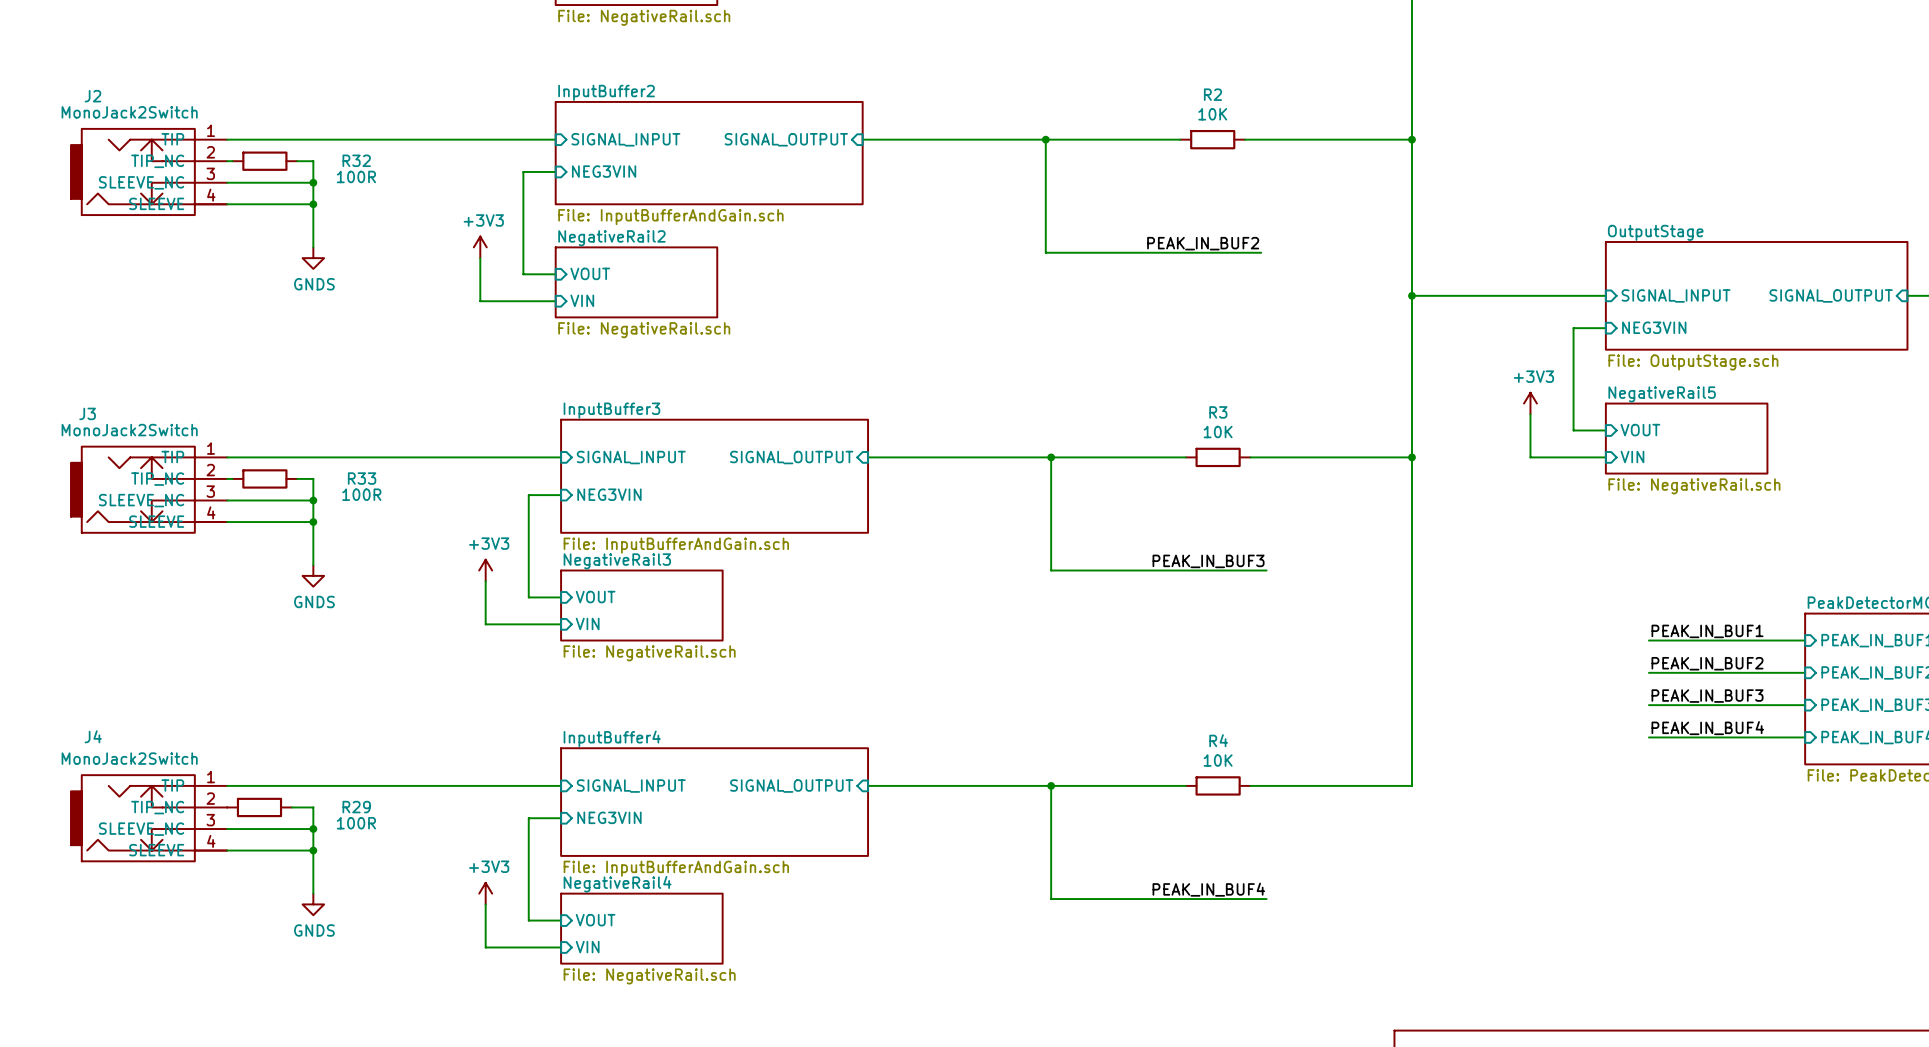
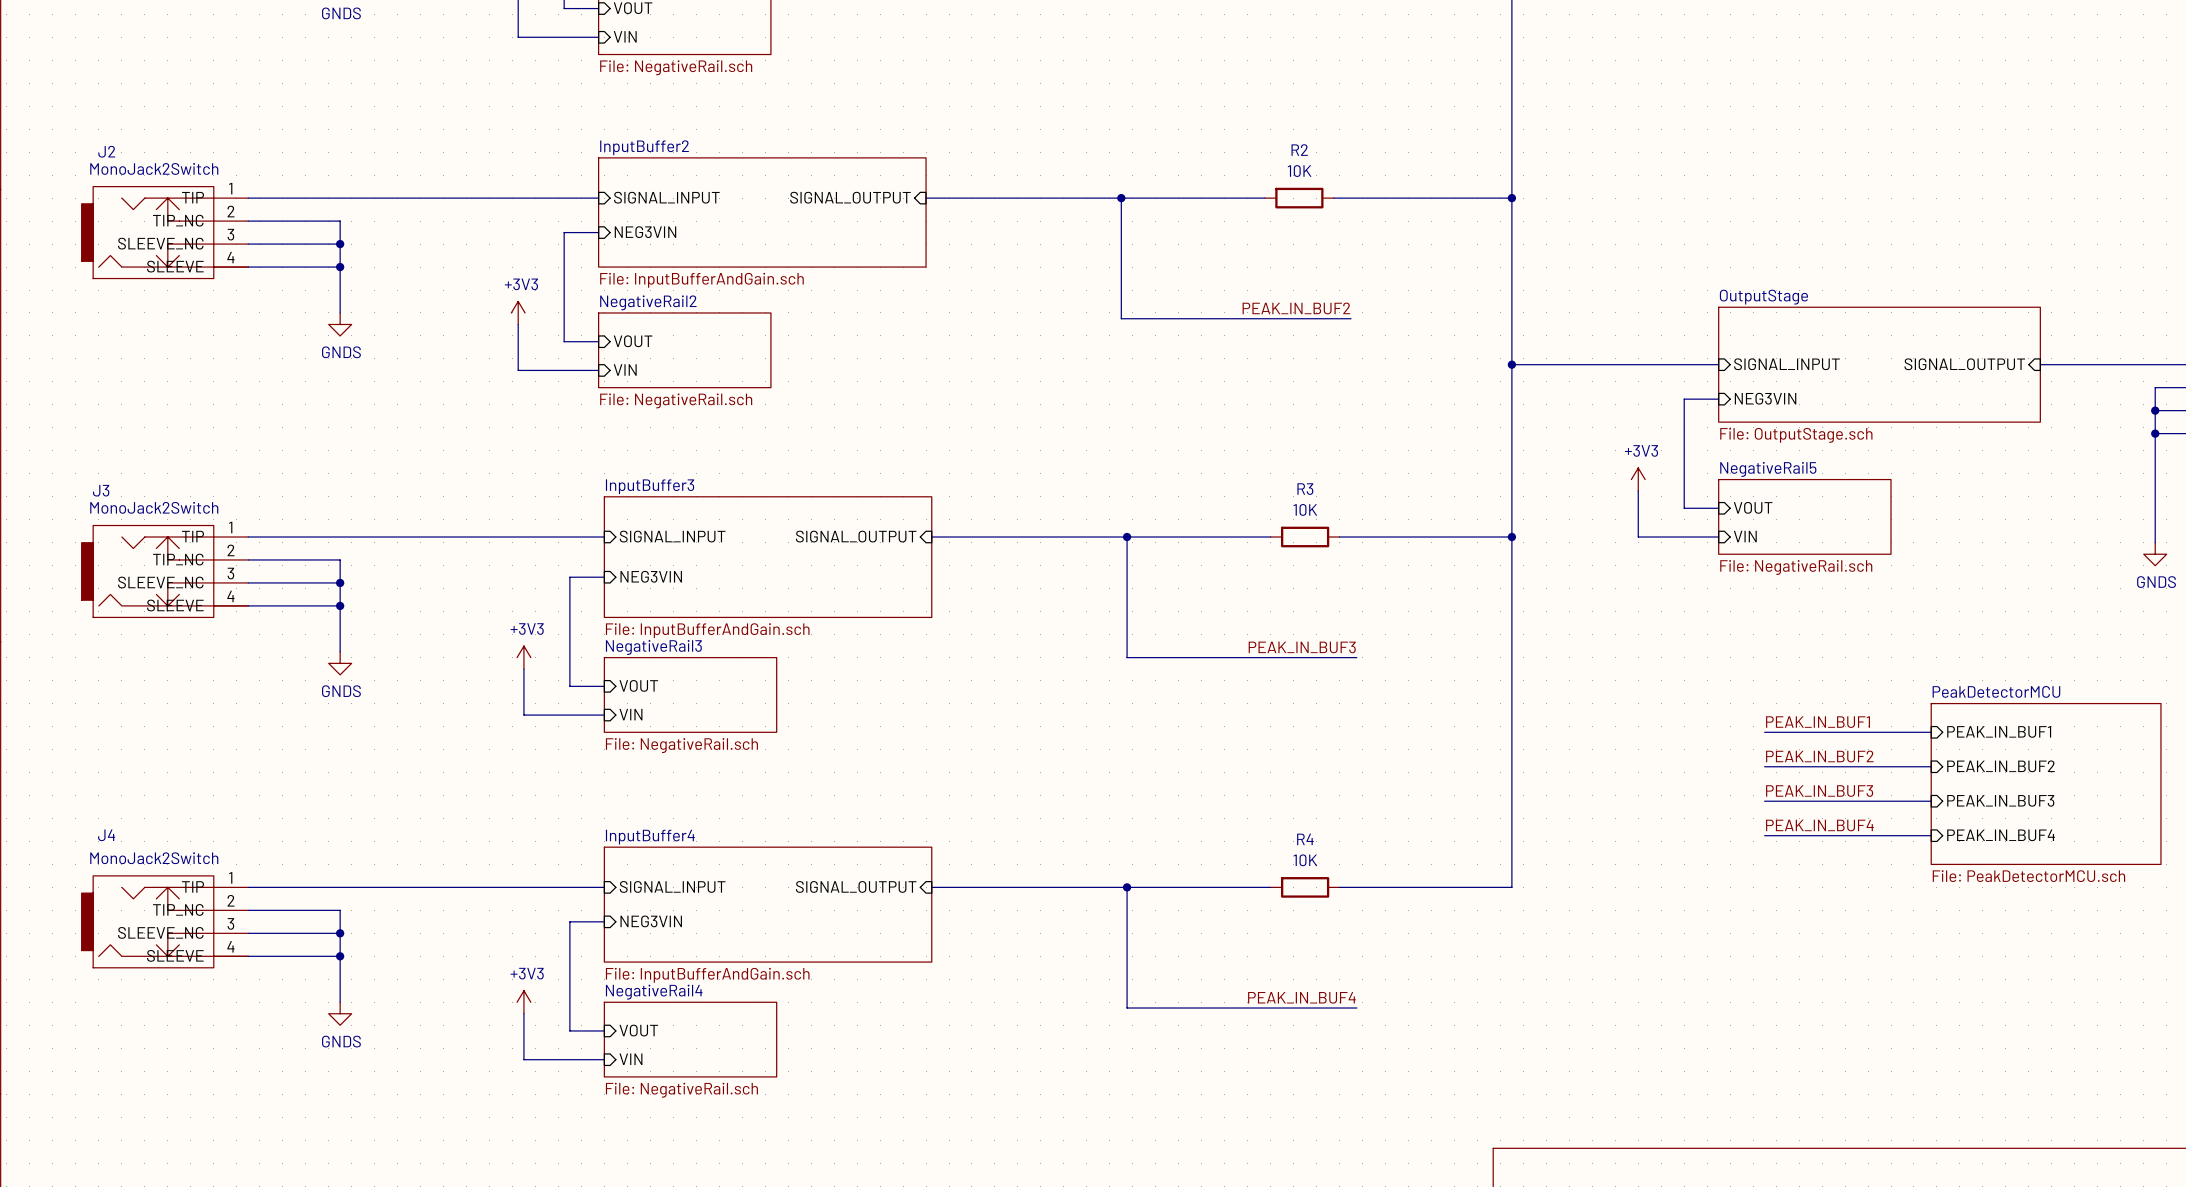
wire: none -> (253, 221) (322, 221)
R32: 100R (264, 161) -> none
wire: none -> (253, 559) (322, 559)
R33: 100R (264, 478) -> none
wire: none -> (248, 910) (317, 910)
R29: 100R (259, 807) -> none

